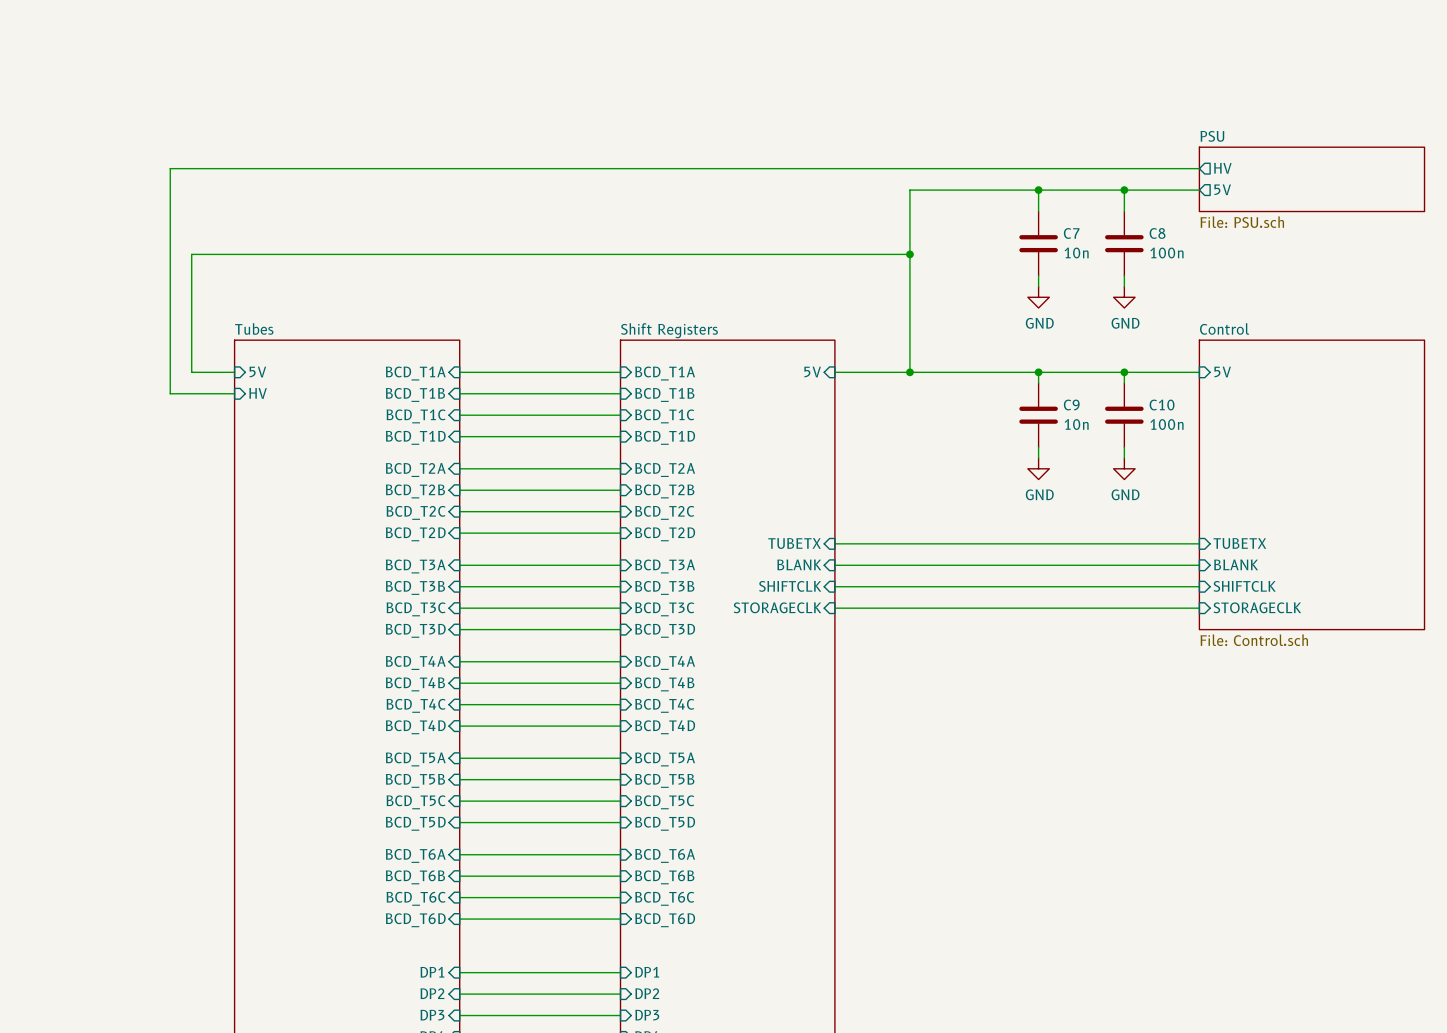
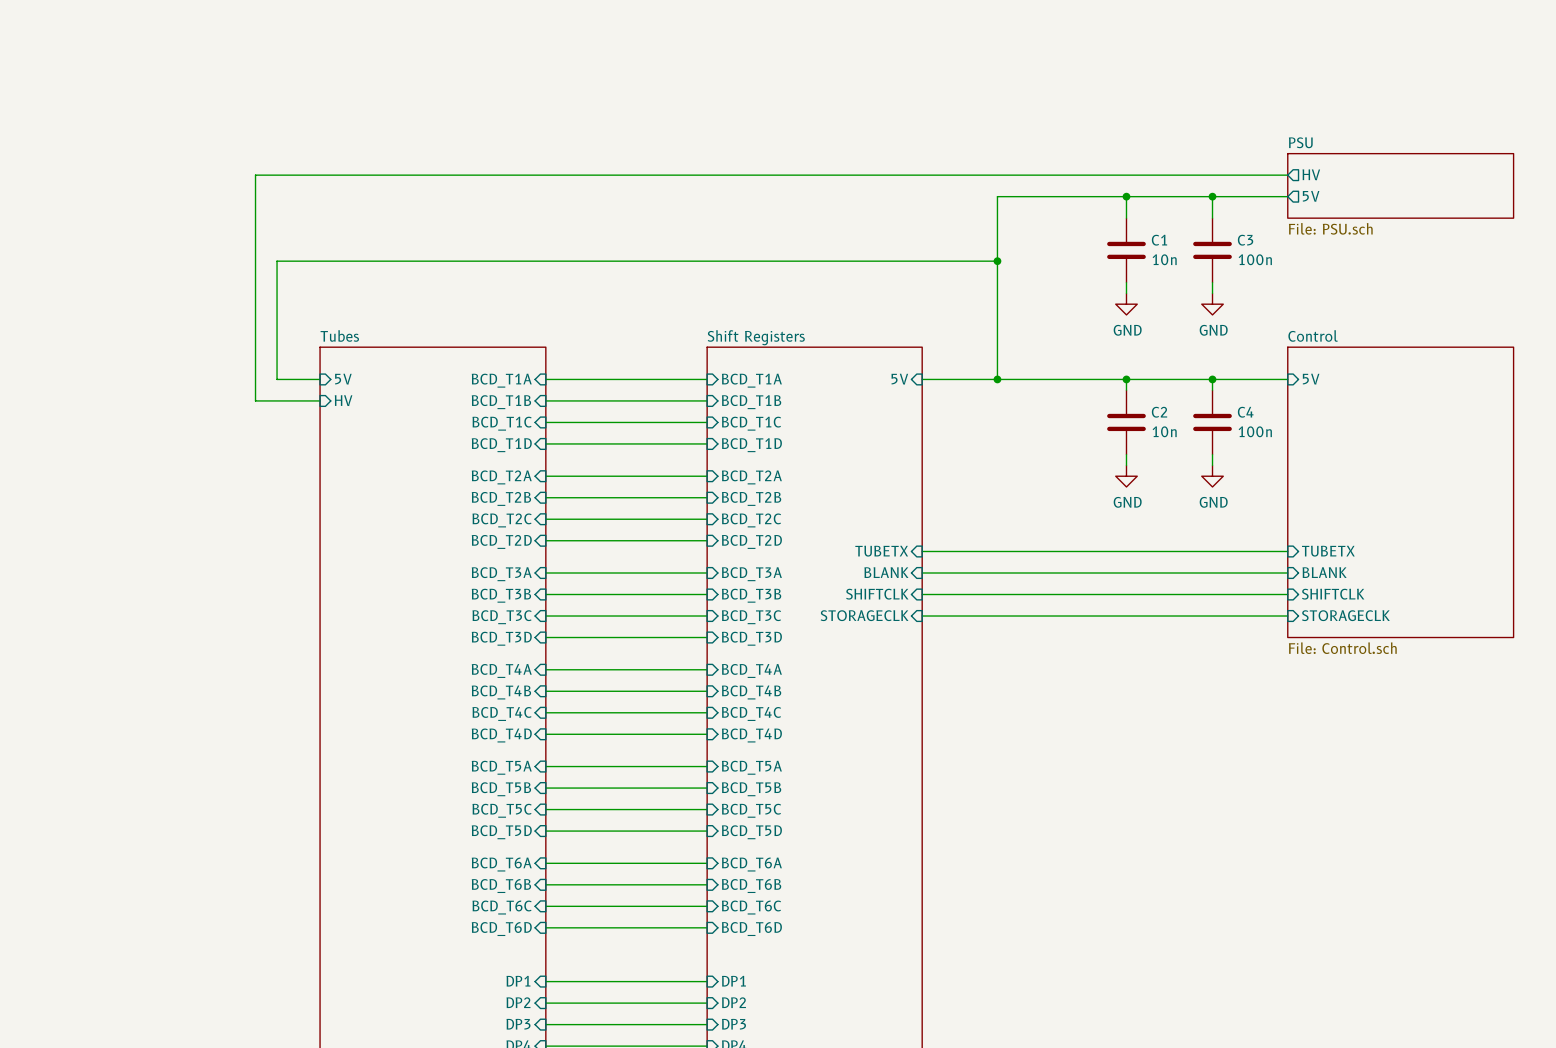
C7 name: C7 (1071, 233) -> C1 (1159, 240)
C8 name: C8 (1157, 233) -> C3 (1245, 240)
C9 name: C9 (1071, 405) -> C2 (1159, 412)
C10 name: C10 (1162, 405) -> C4 (1245, 412)

